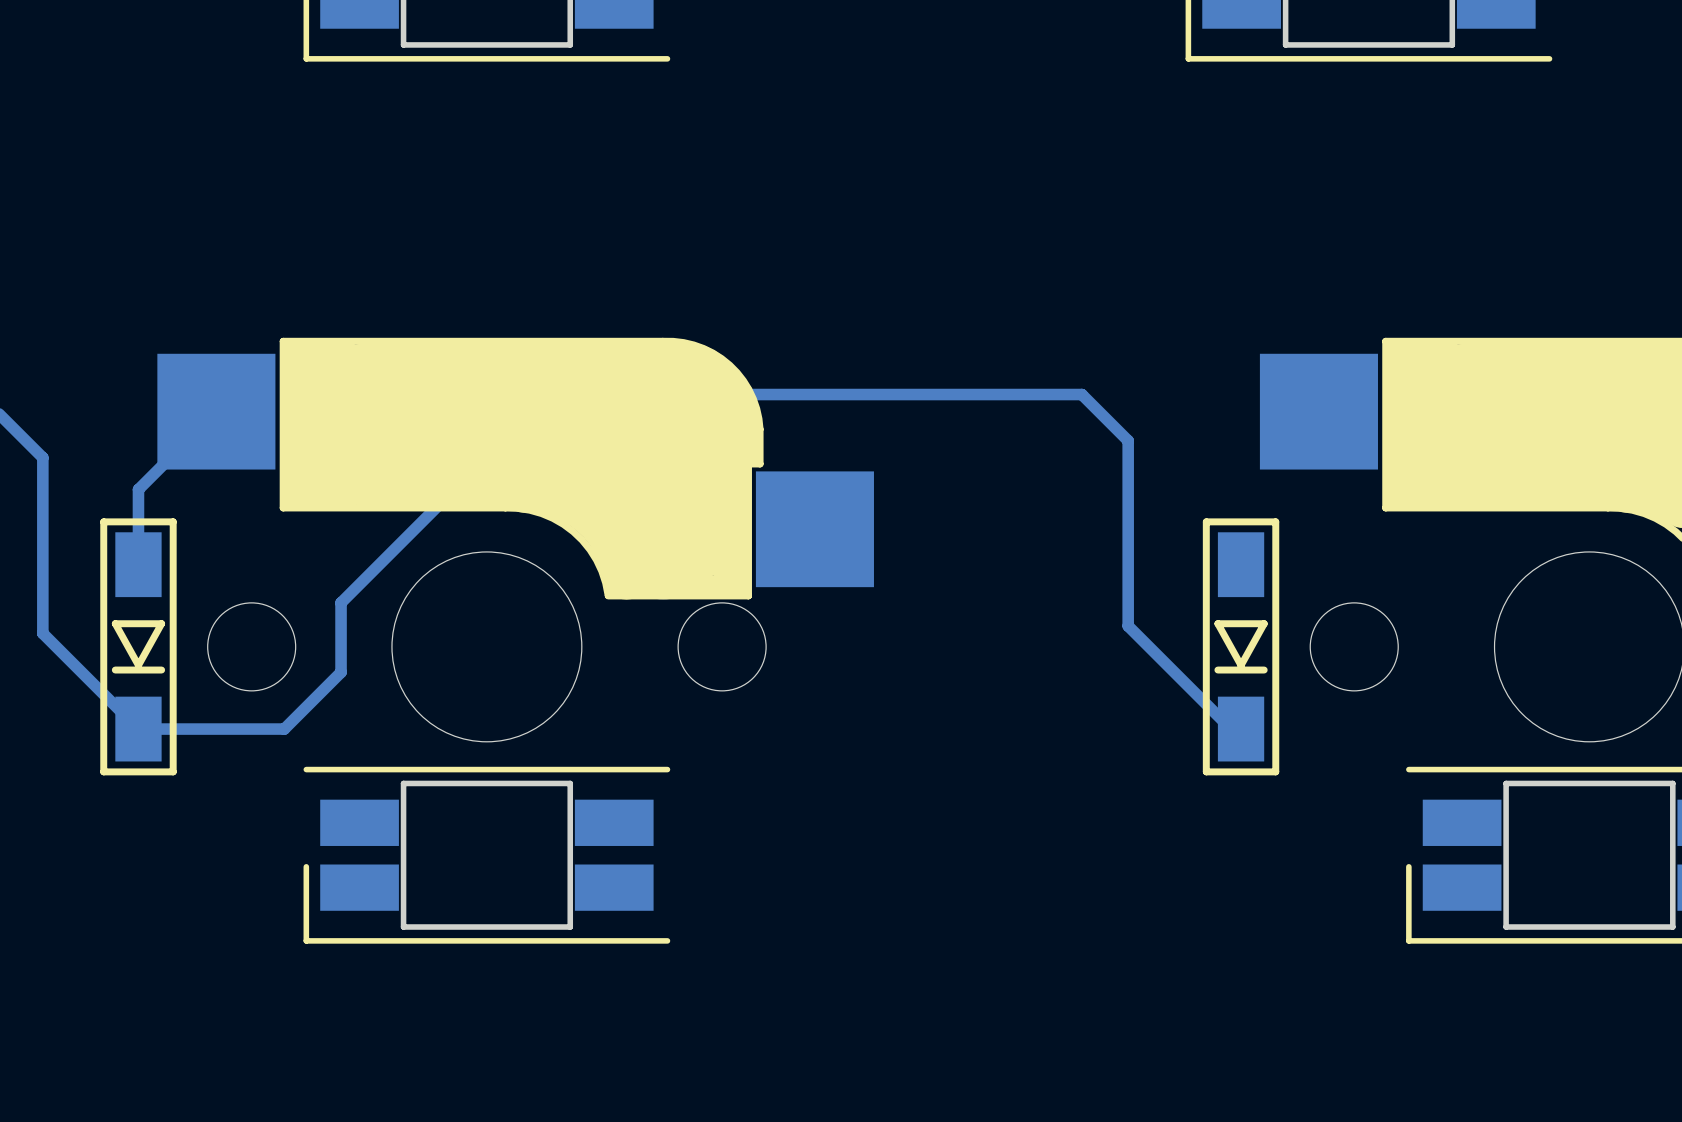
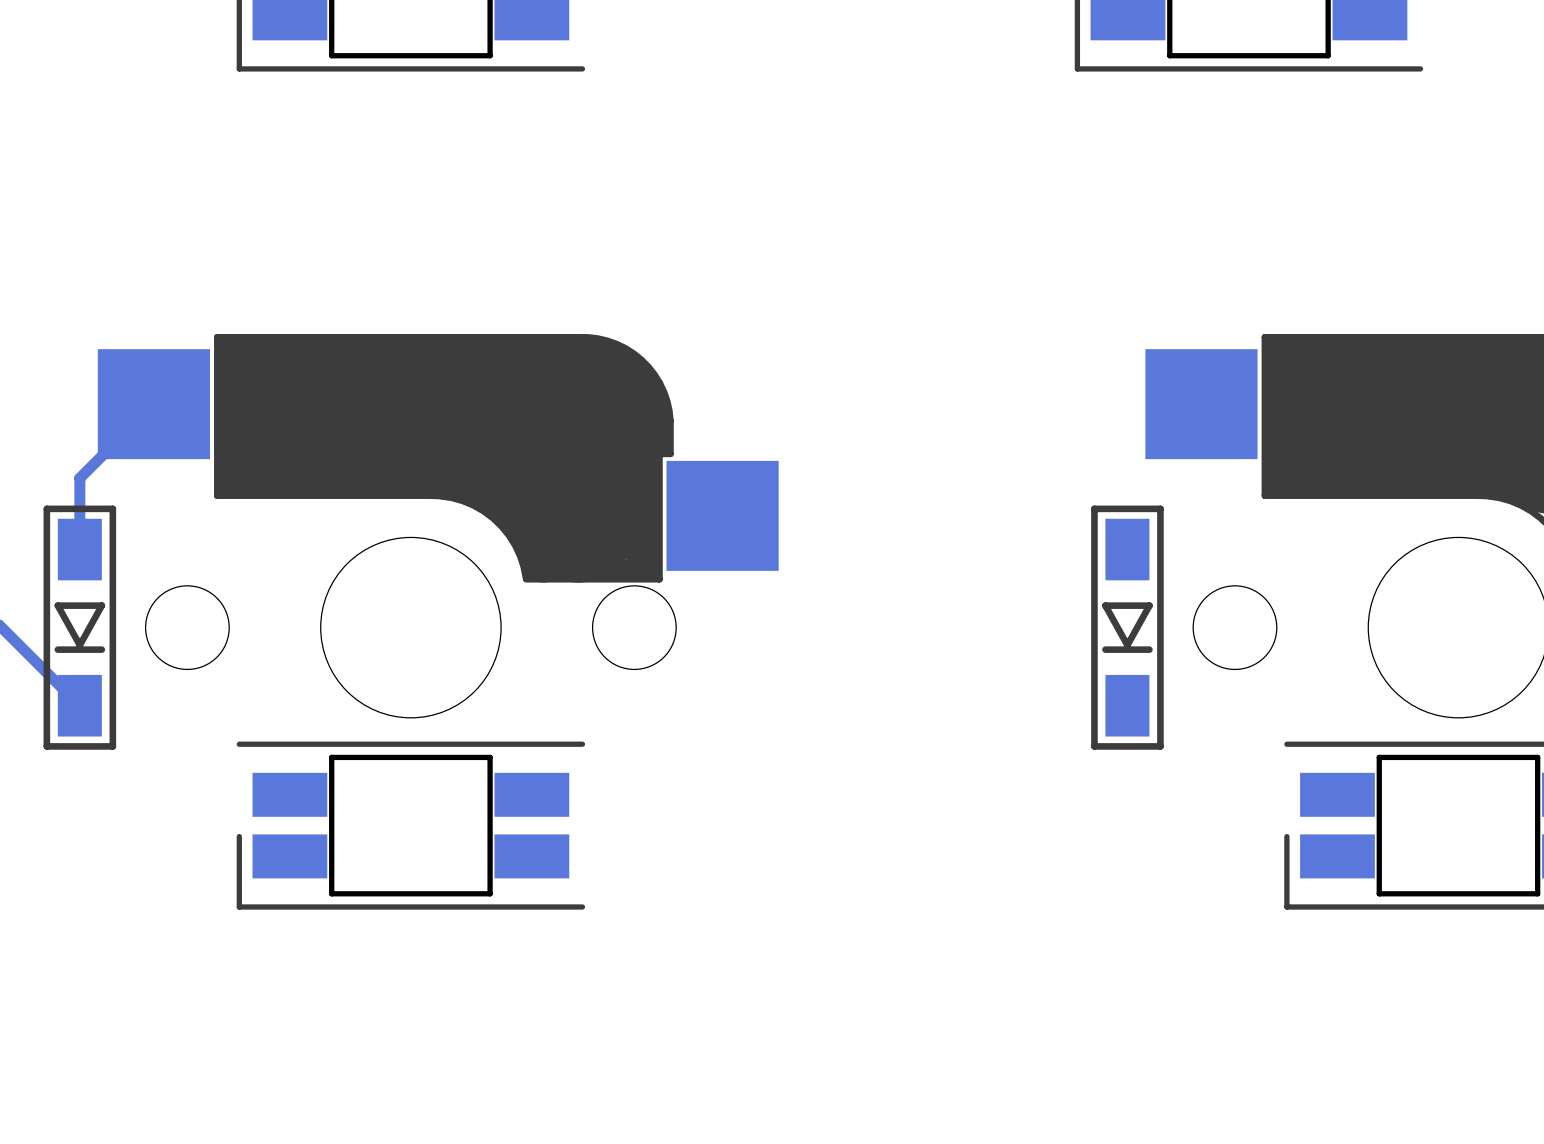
track: (1241, 729) (1231, 729) (1128, 626) (1128, 440) (1081, 394) (549, 394) (341, 602) (341, 672) (284, 729) (138, 729) -> none

